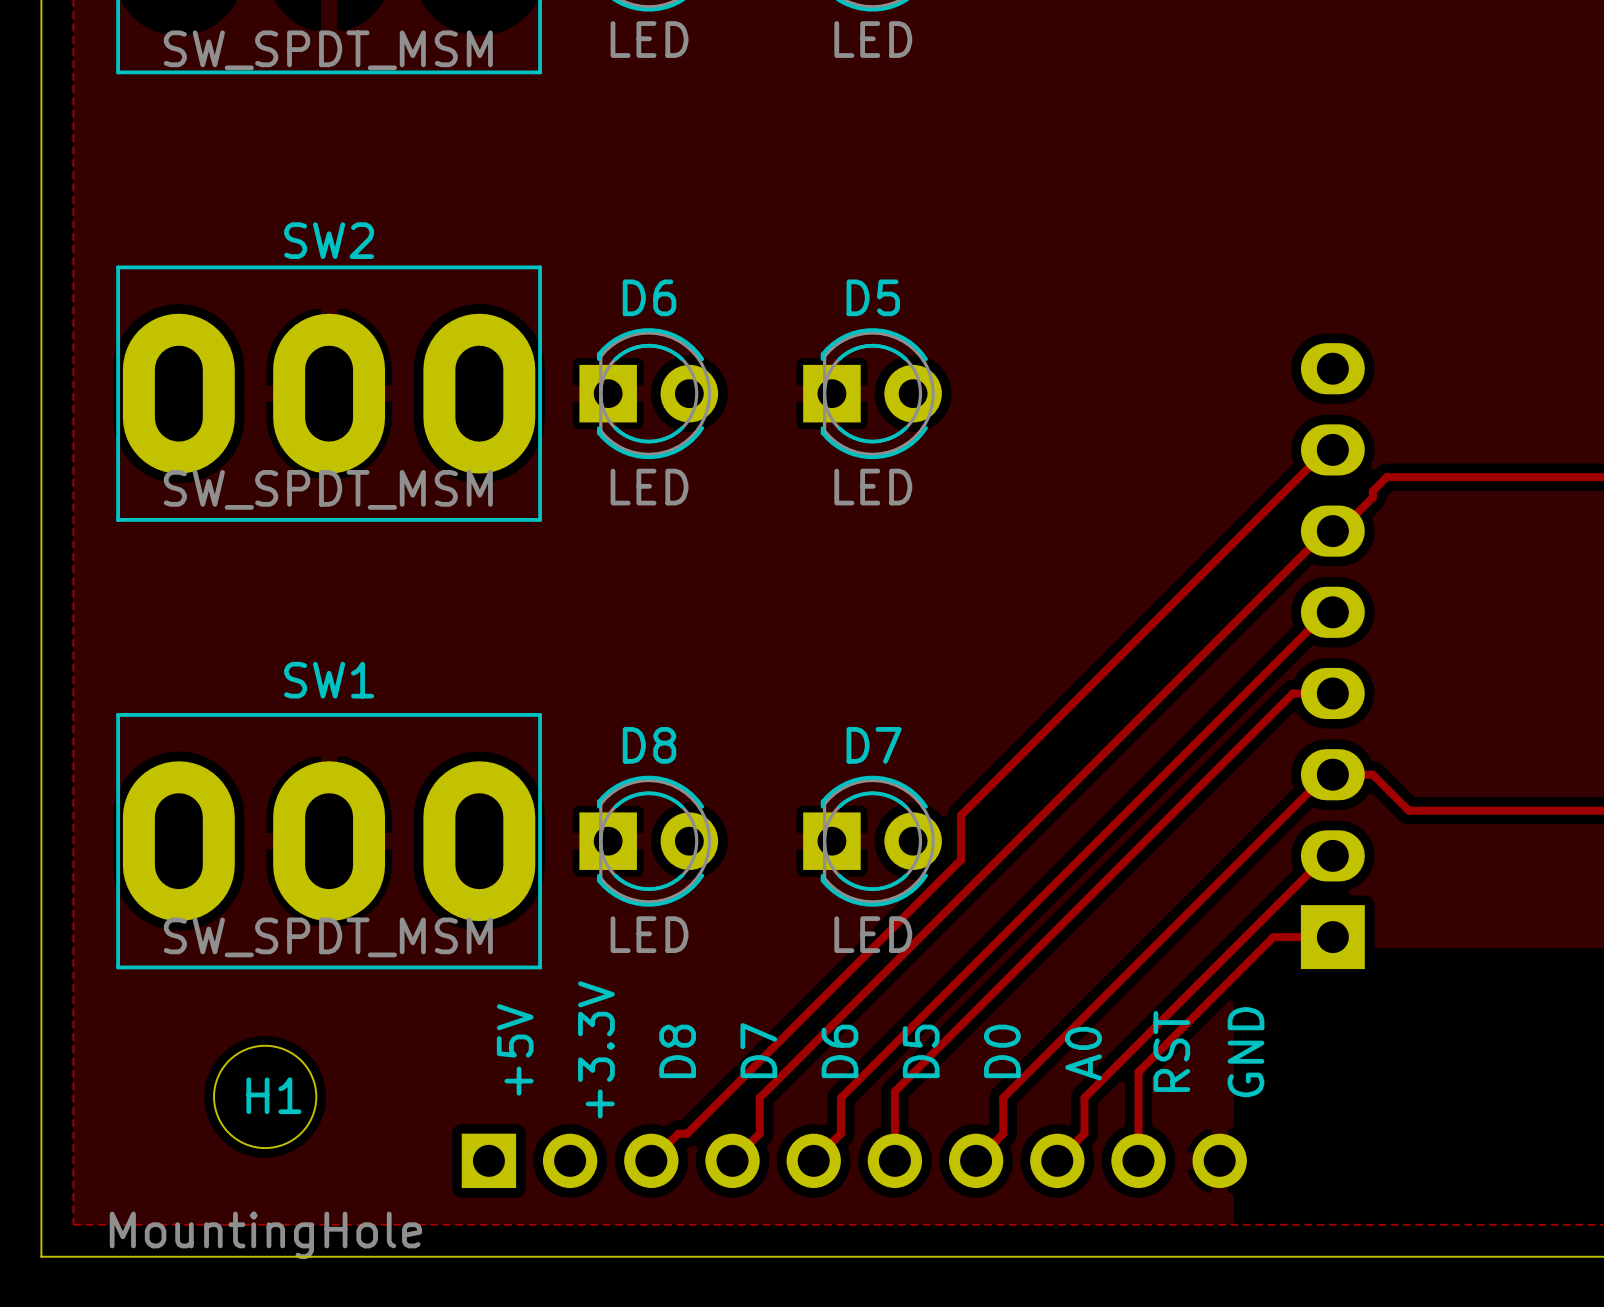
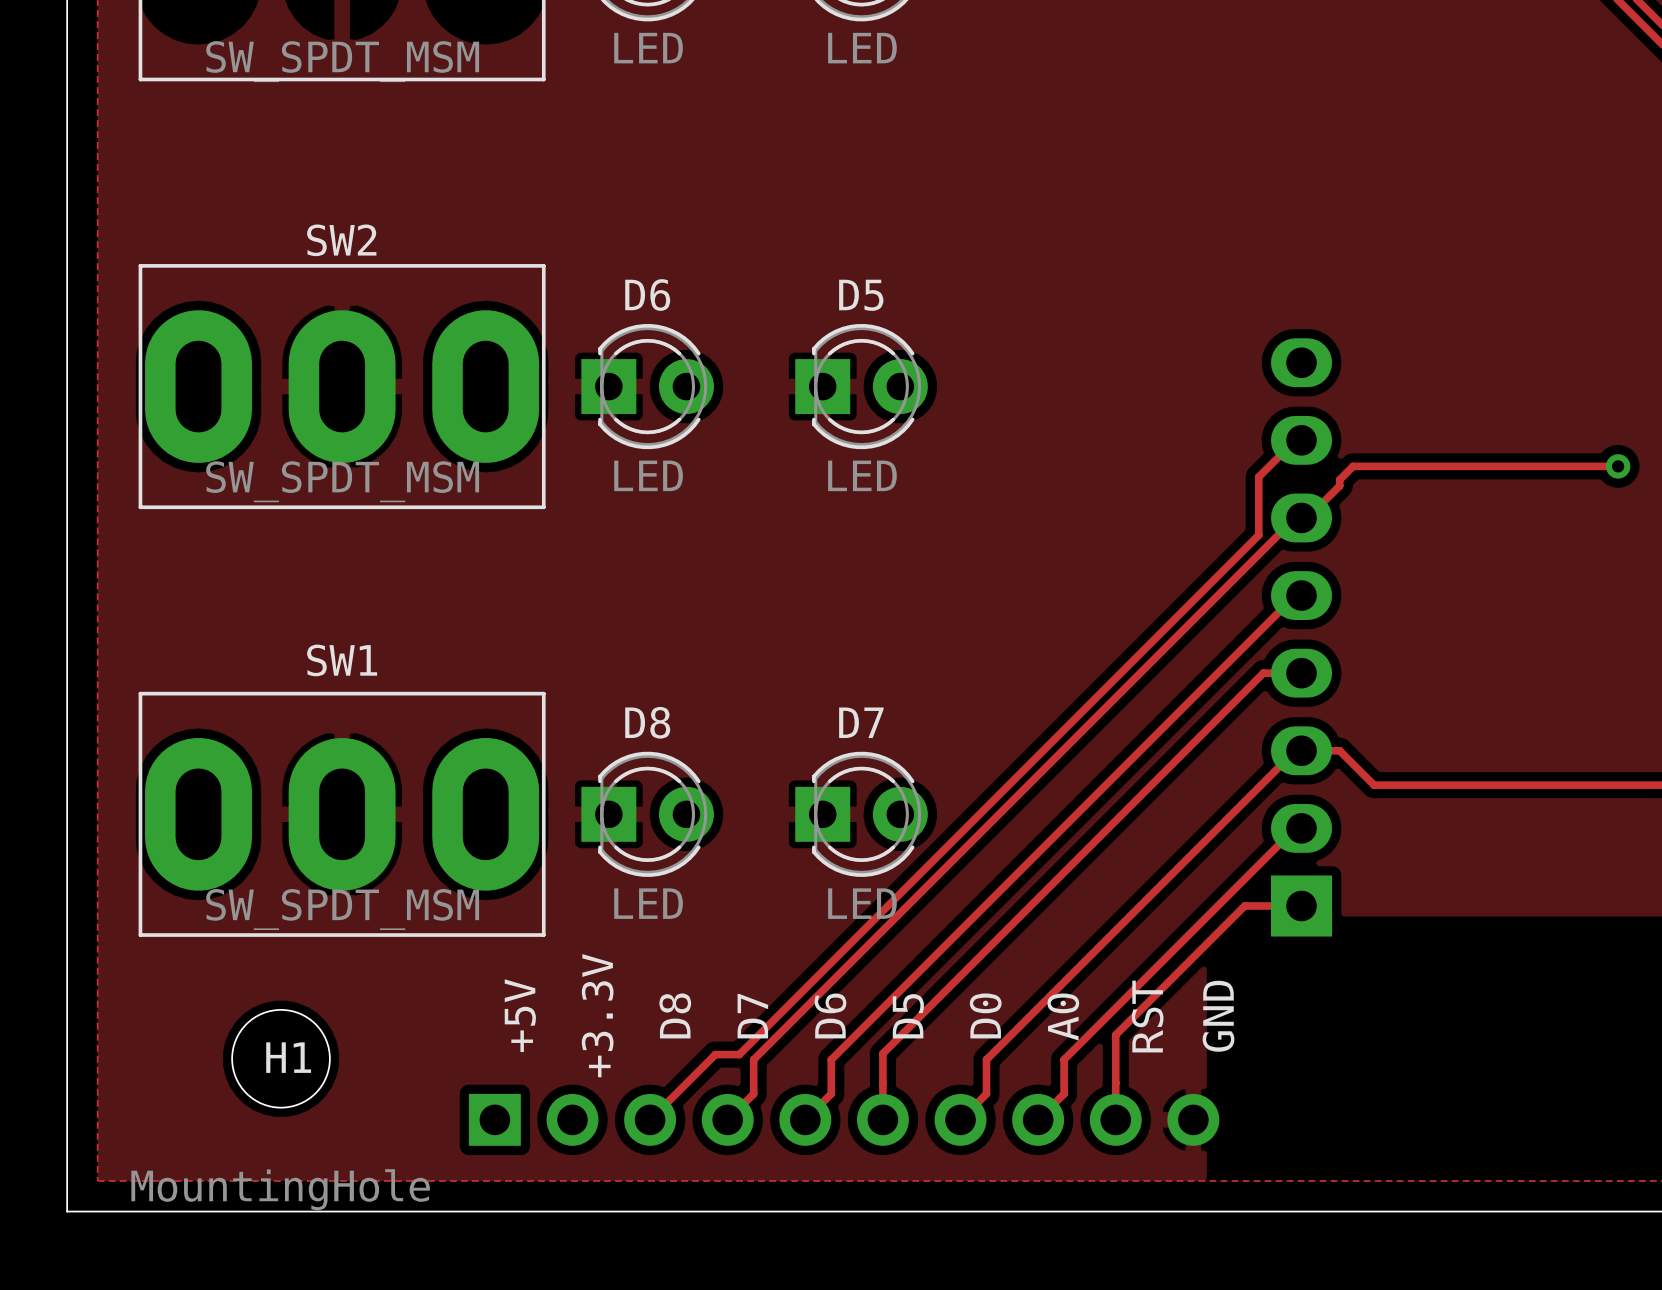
track: (1288, 488) (960, 815) (960, 859) (687, 1133) (678, 1133) -> (1258, 477) (1258, 535) (739, 1054) (715, 1054) (676, 1093)

